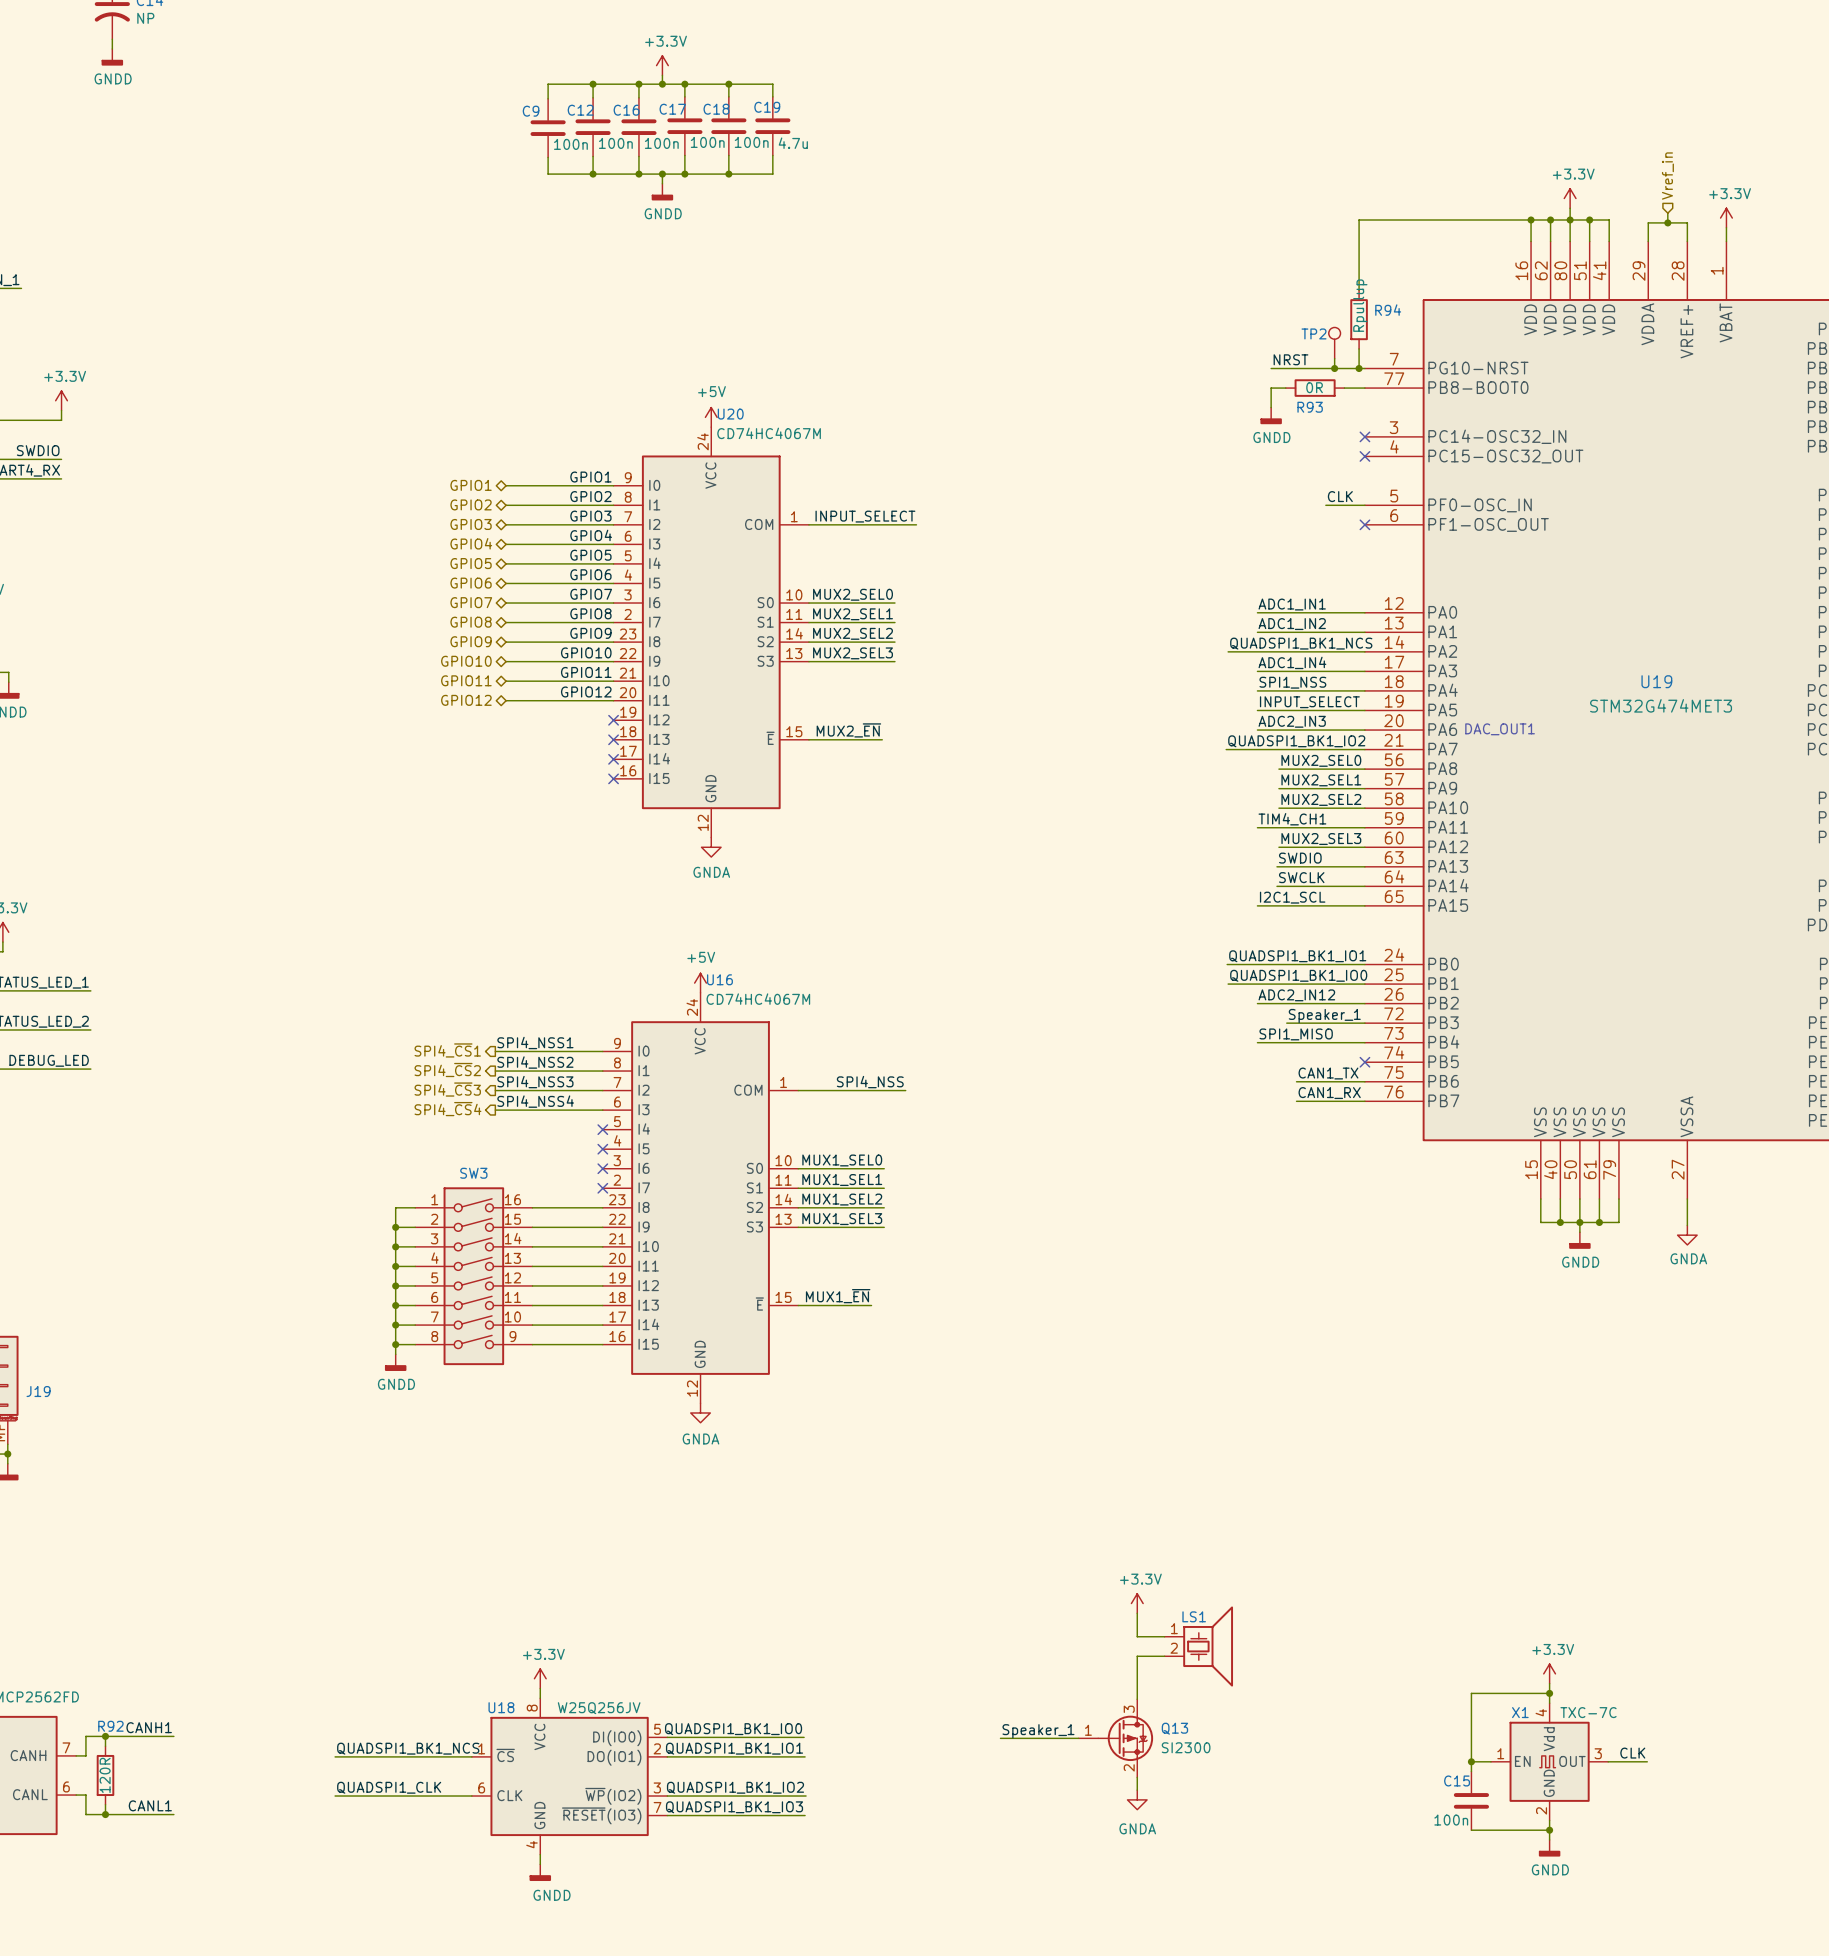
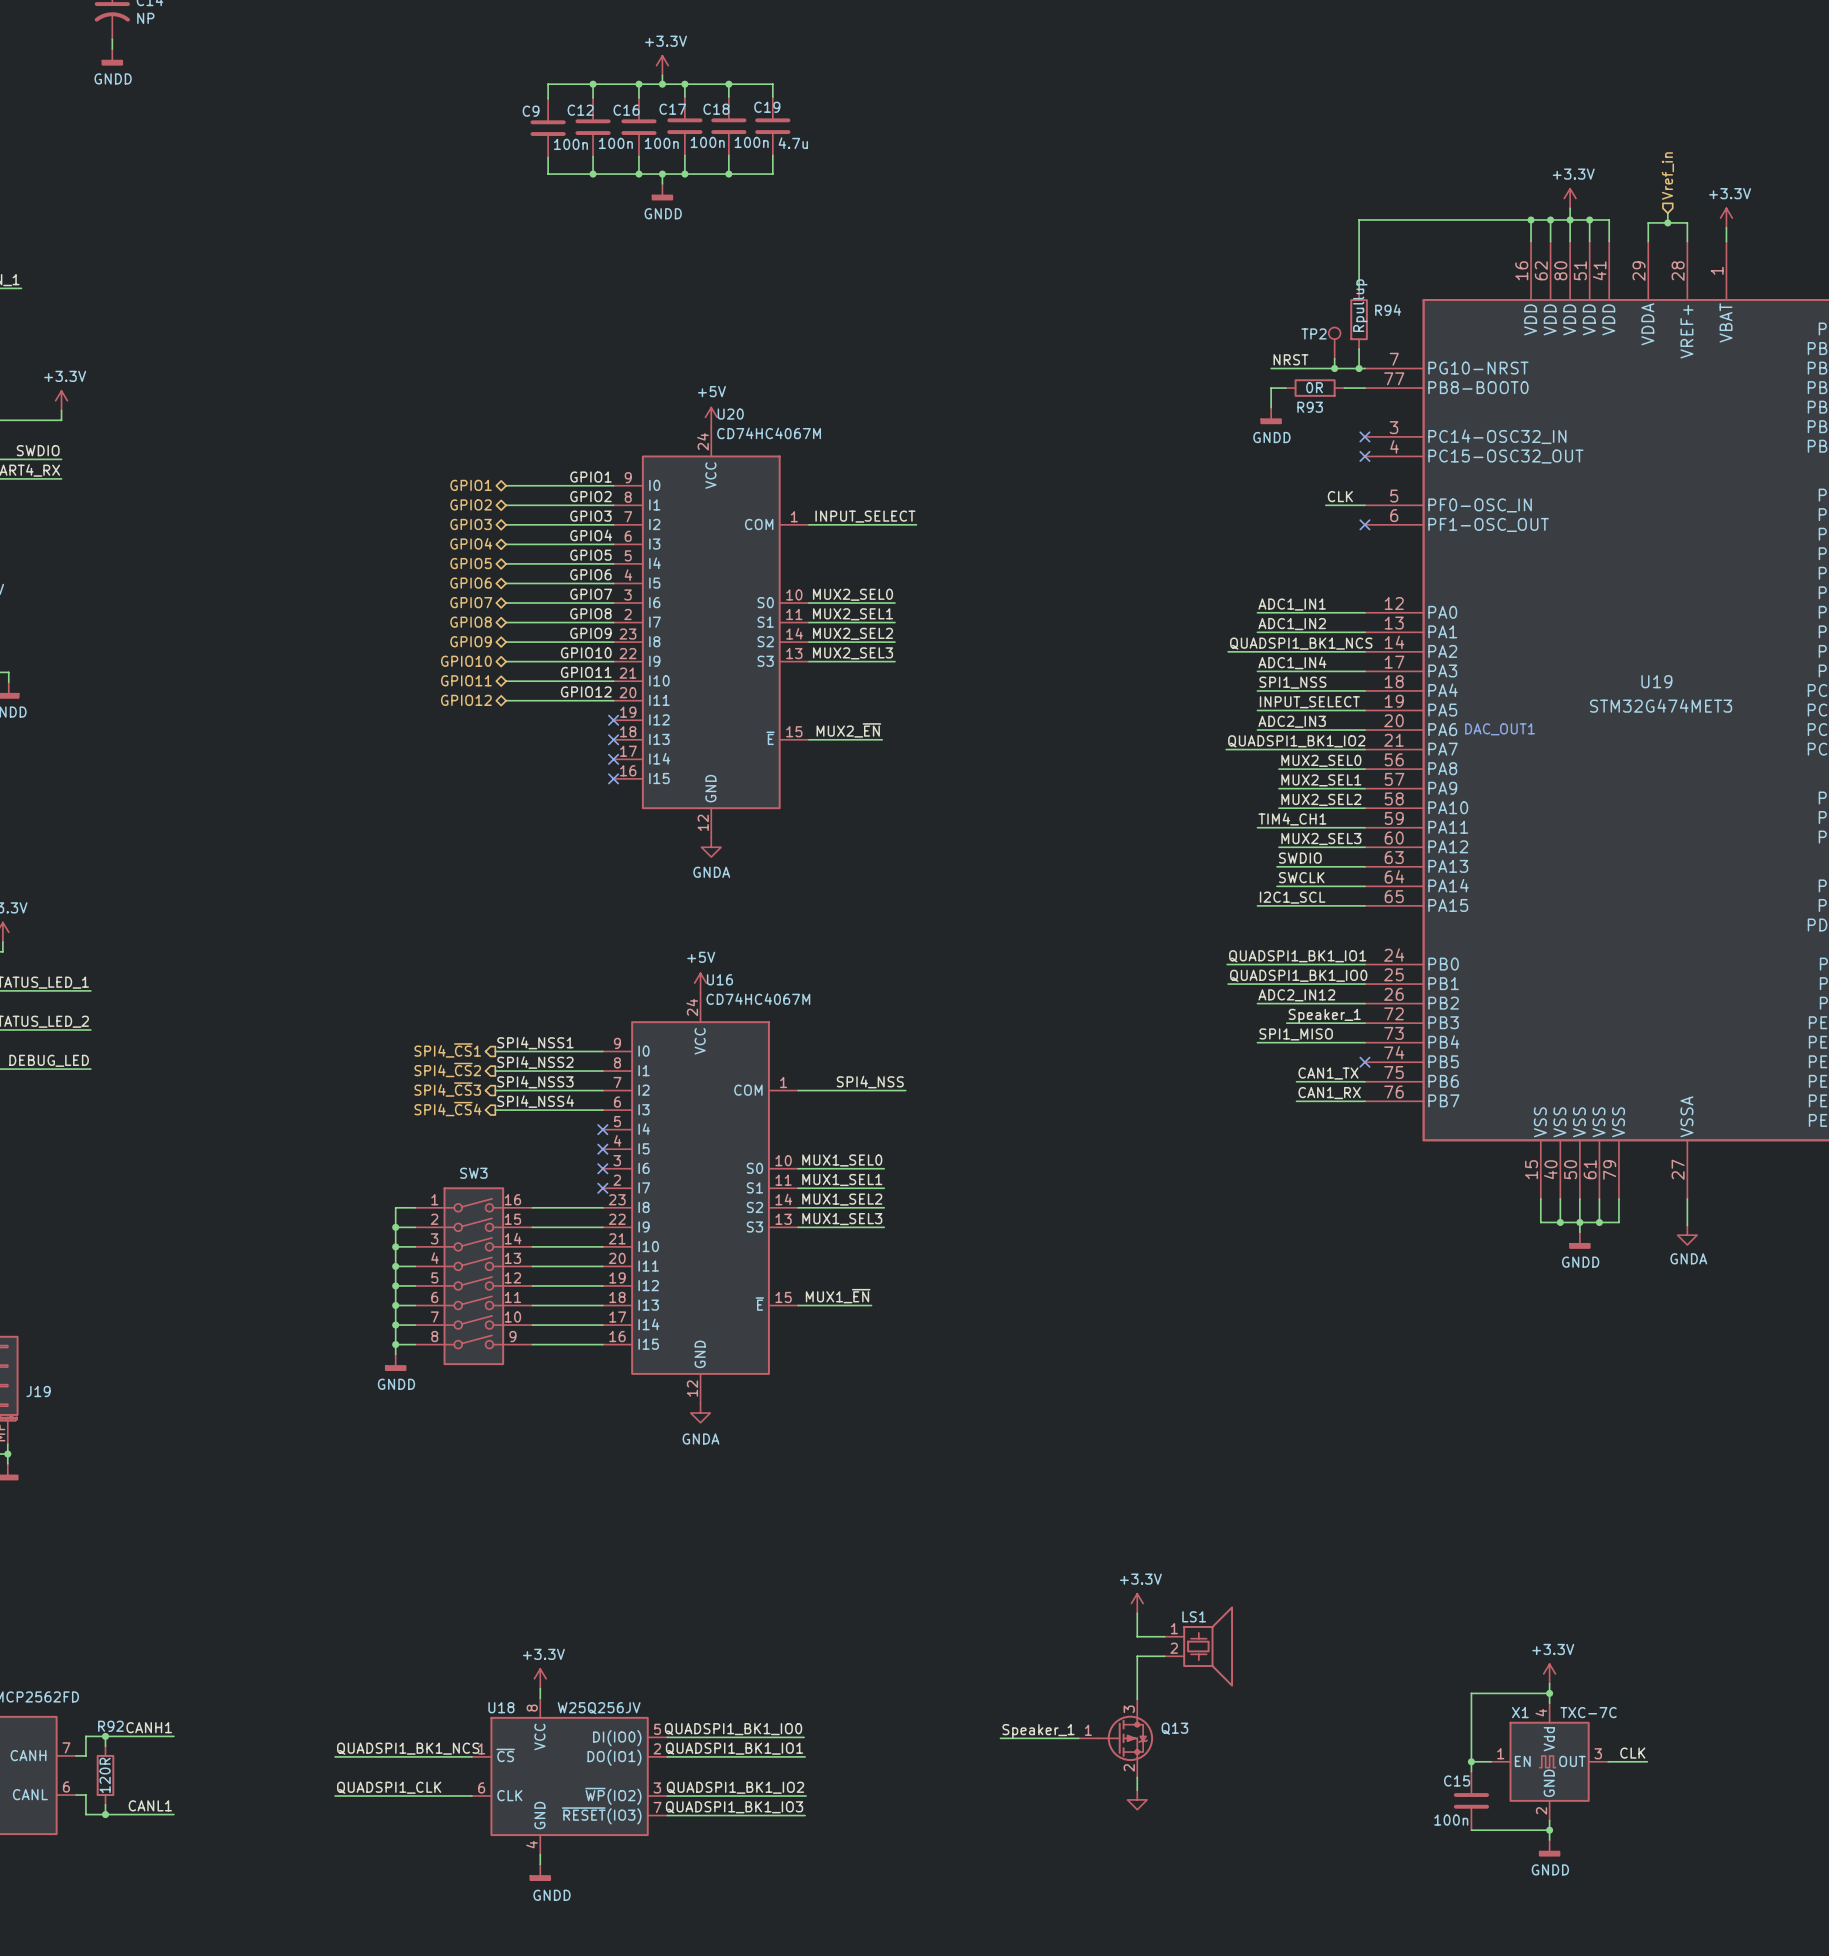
Q13 value: SI2300 (1186, 1747) -> none
power symbol text: GNDA (1137, 1828) -> none

